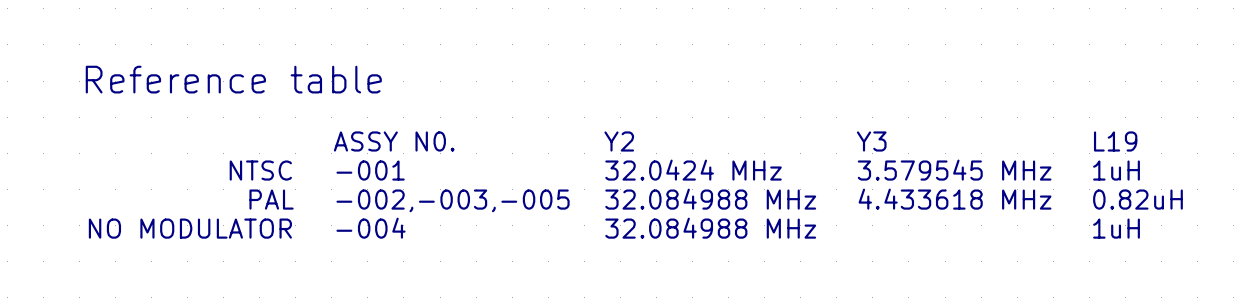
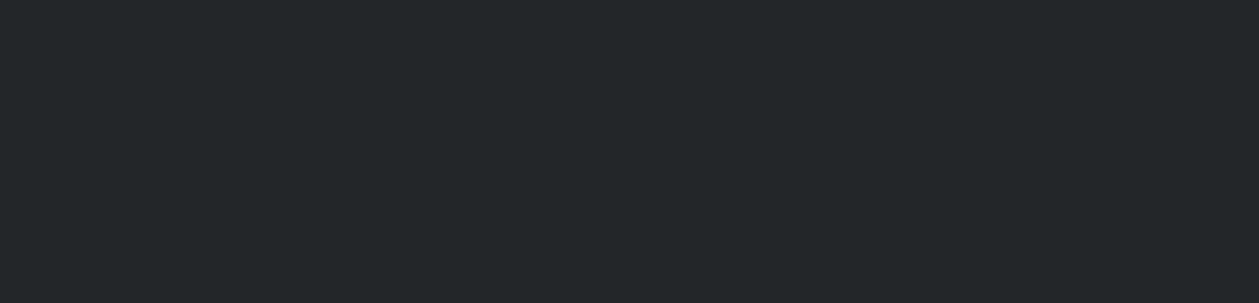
text: Reference table (233, 79) -> none
text: ASSY N0. (394, 141) -> none
text: Y2 (619, 141) -> none
text: Y3 (871, 141) -> none
text: L19 (1115, 141) -> none
text: NTSC (260, 170) -> none
text: -001 (370, 170) -> none
text: 32.0424 MHz (693, 170) -> none
text: 3.579545 MHz (954, 170) -> none
text: 1uH (1116, 170) -> none
text: PAL (271, 199) -> none
text: 32.084988 MHz (710, 199) -> none
text: 4.433618 MHz (955, 199) -> none
text: 0.82uH (1137, 199) -> none
text: -002,-003,-005 (453, 200) -> none
text: NO MODULATOR (190, 228) -> none
text: -004 (371, 228) -> none
text: 32.084988 MHz (710, 228) -> none
text: 1uH (1116, 228) -> none

